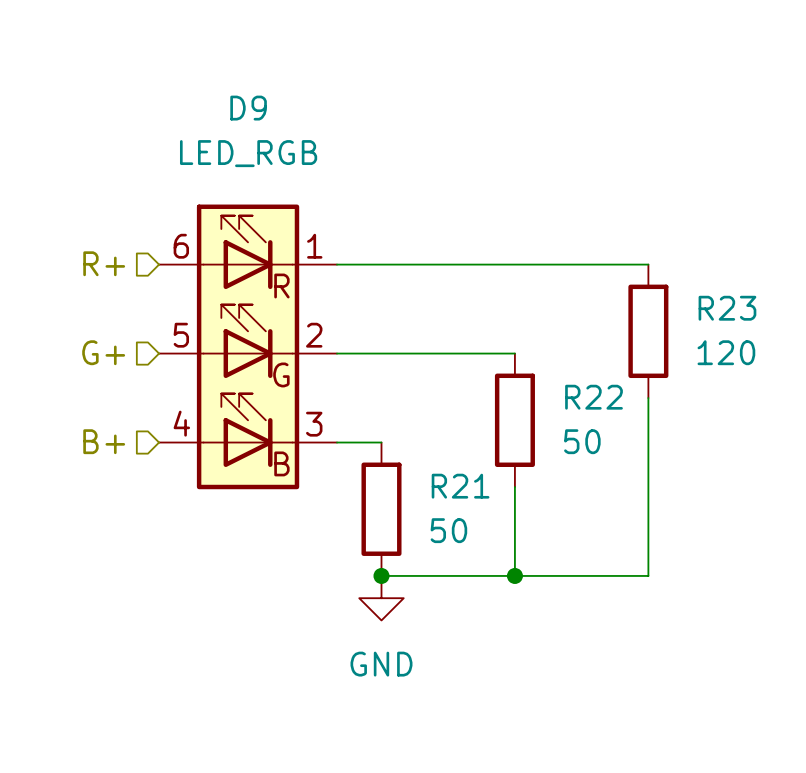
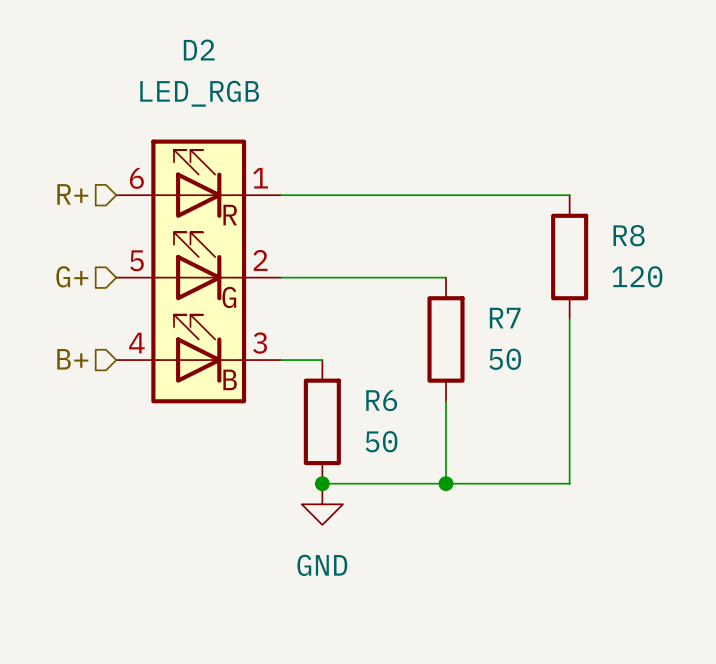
D9 name: D9 (248, 108) -> D2 (199, 50)
R23 name: R23 (727, 308) -> R8 (629, 235)
R22 name: R22 (594, 397) -> R7 (505, 318)
R21 name: R21 (460, 486) -> R6 (381, 400)

